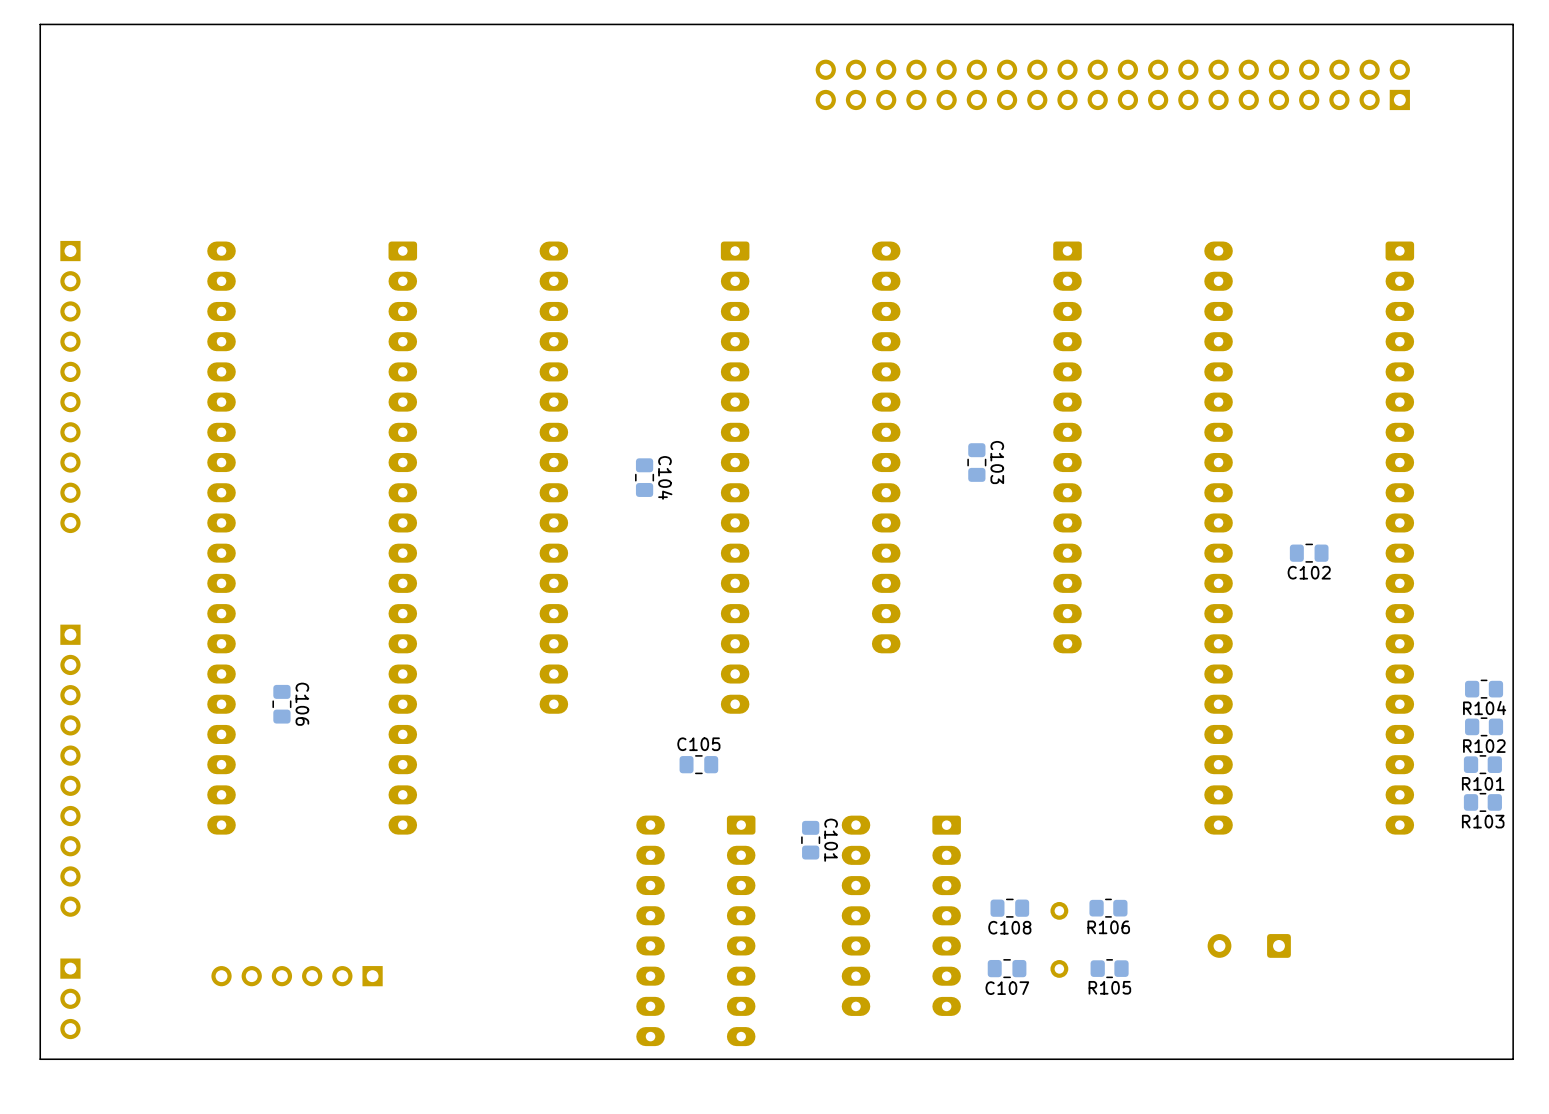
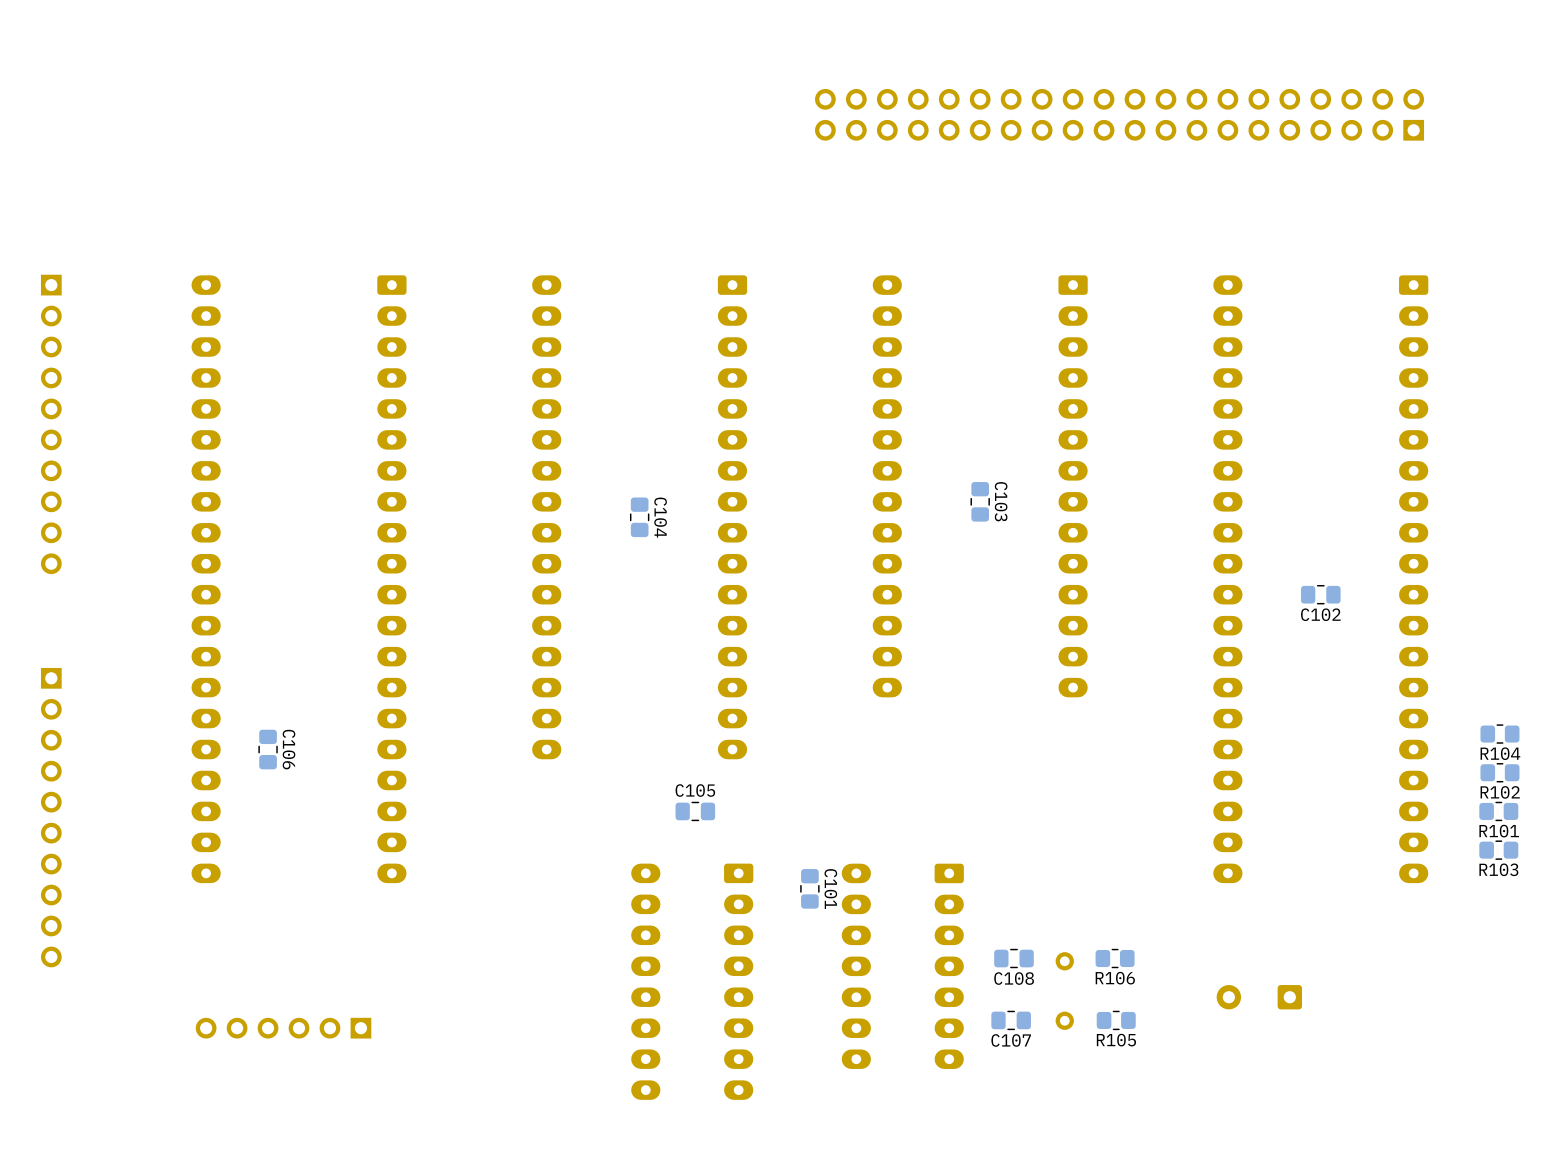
board edge: (1513, 24) (1513, 1059) (40, 1059) (40, 24) (1513, 24) -> none
part: (70, 998) -> none

